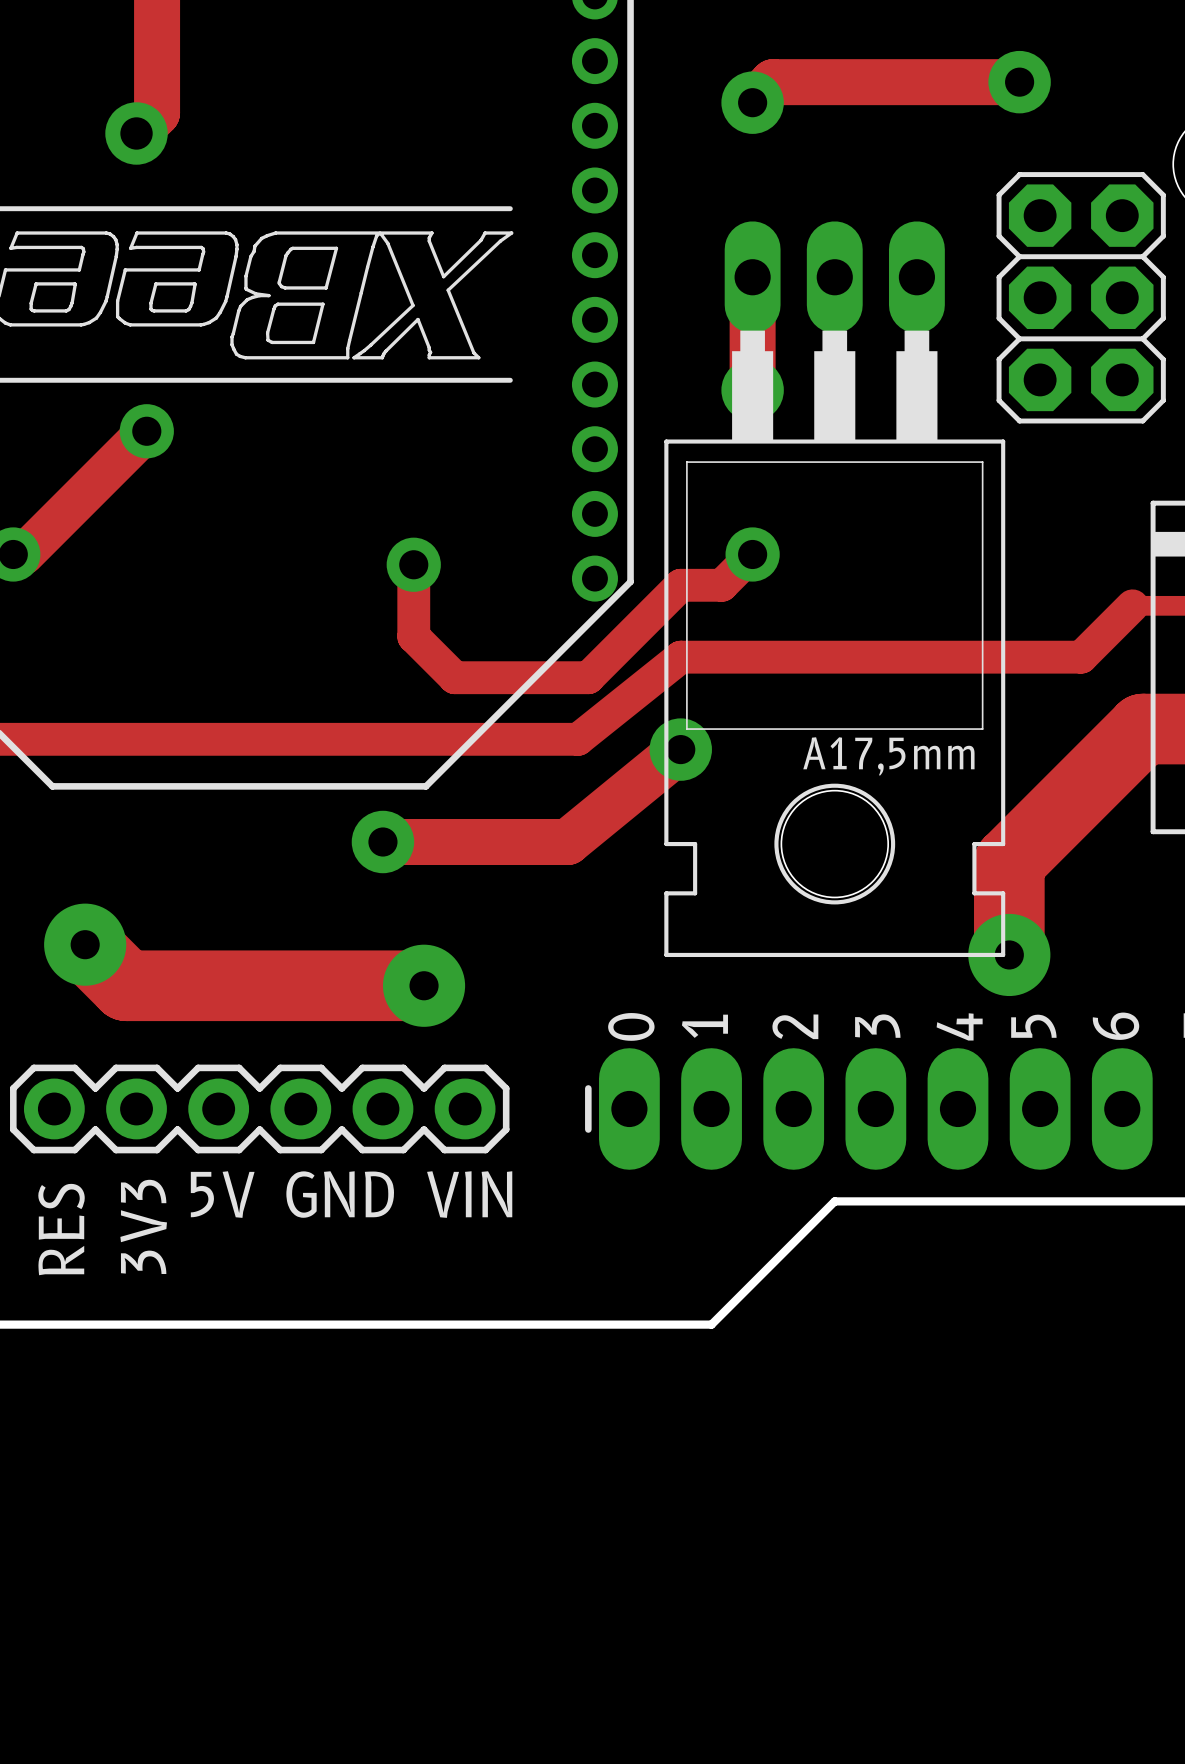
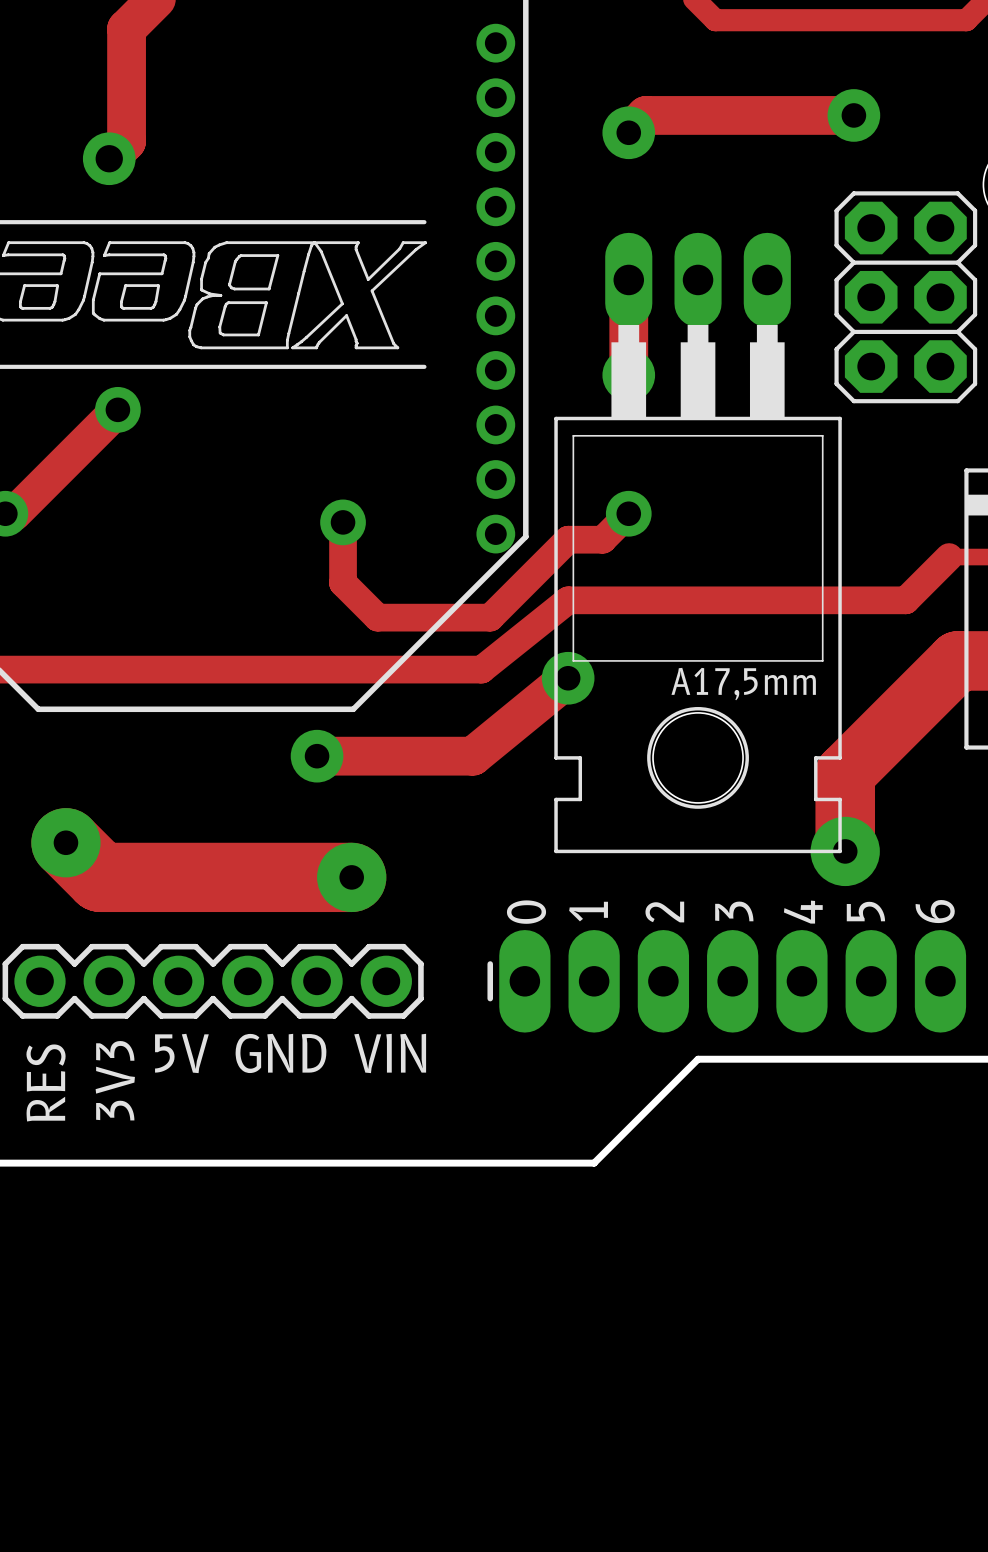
track width: thin (85, 944) (126, 985) (424, 985) -> thick (65, 842) (100, 877) (351, 877)

